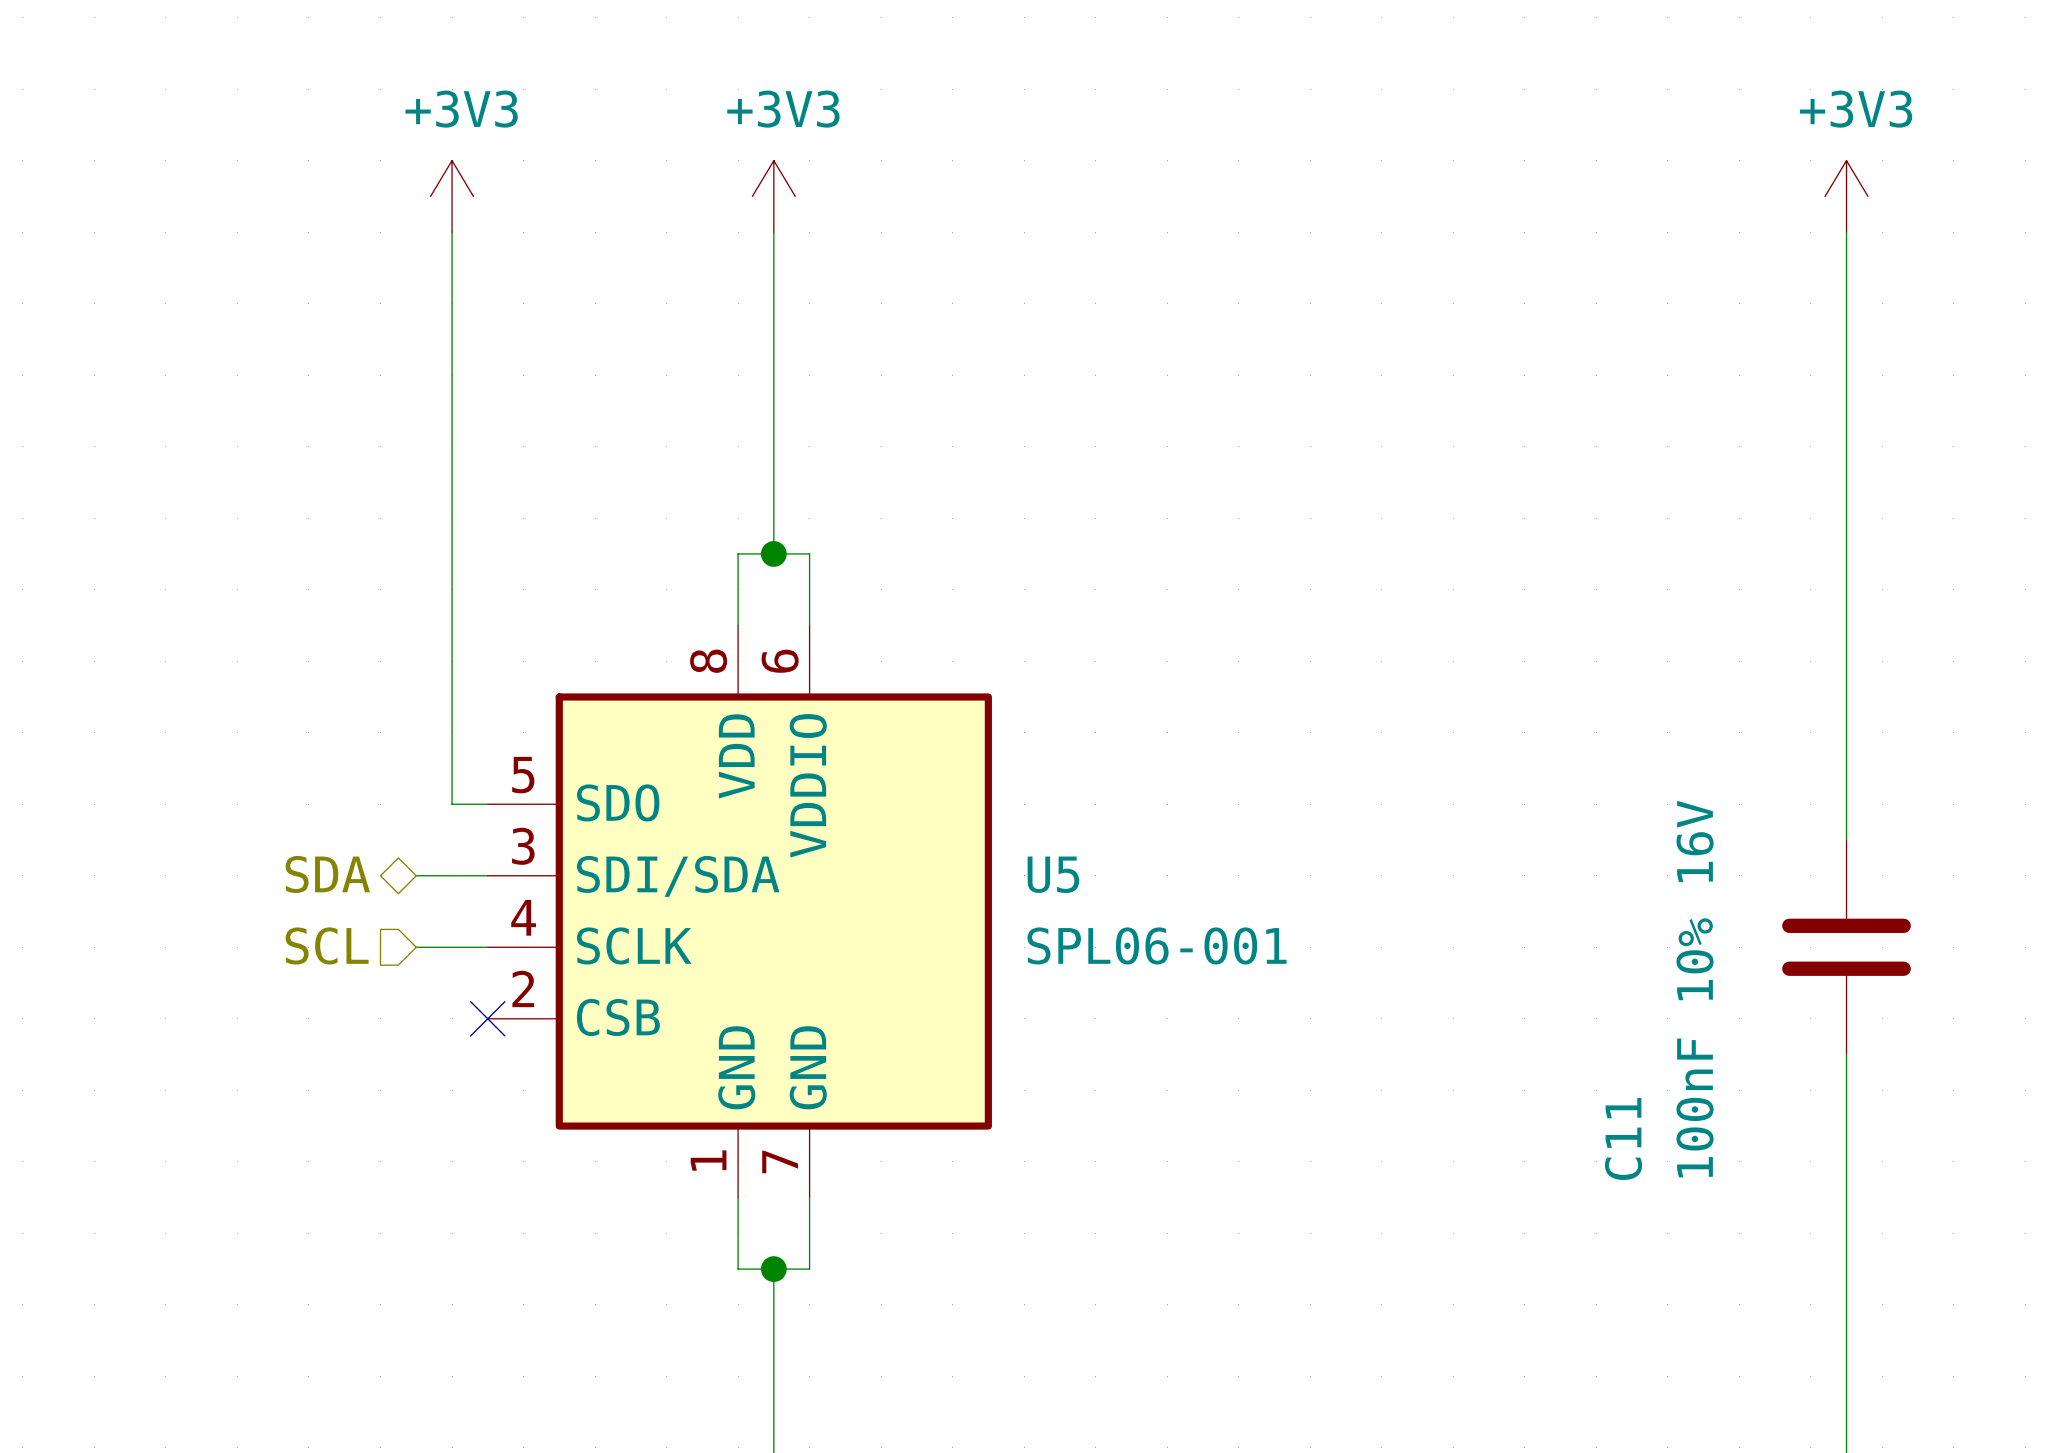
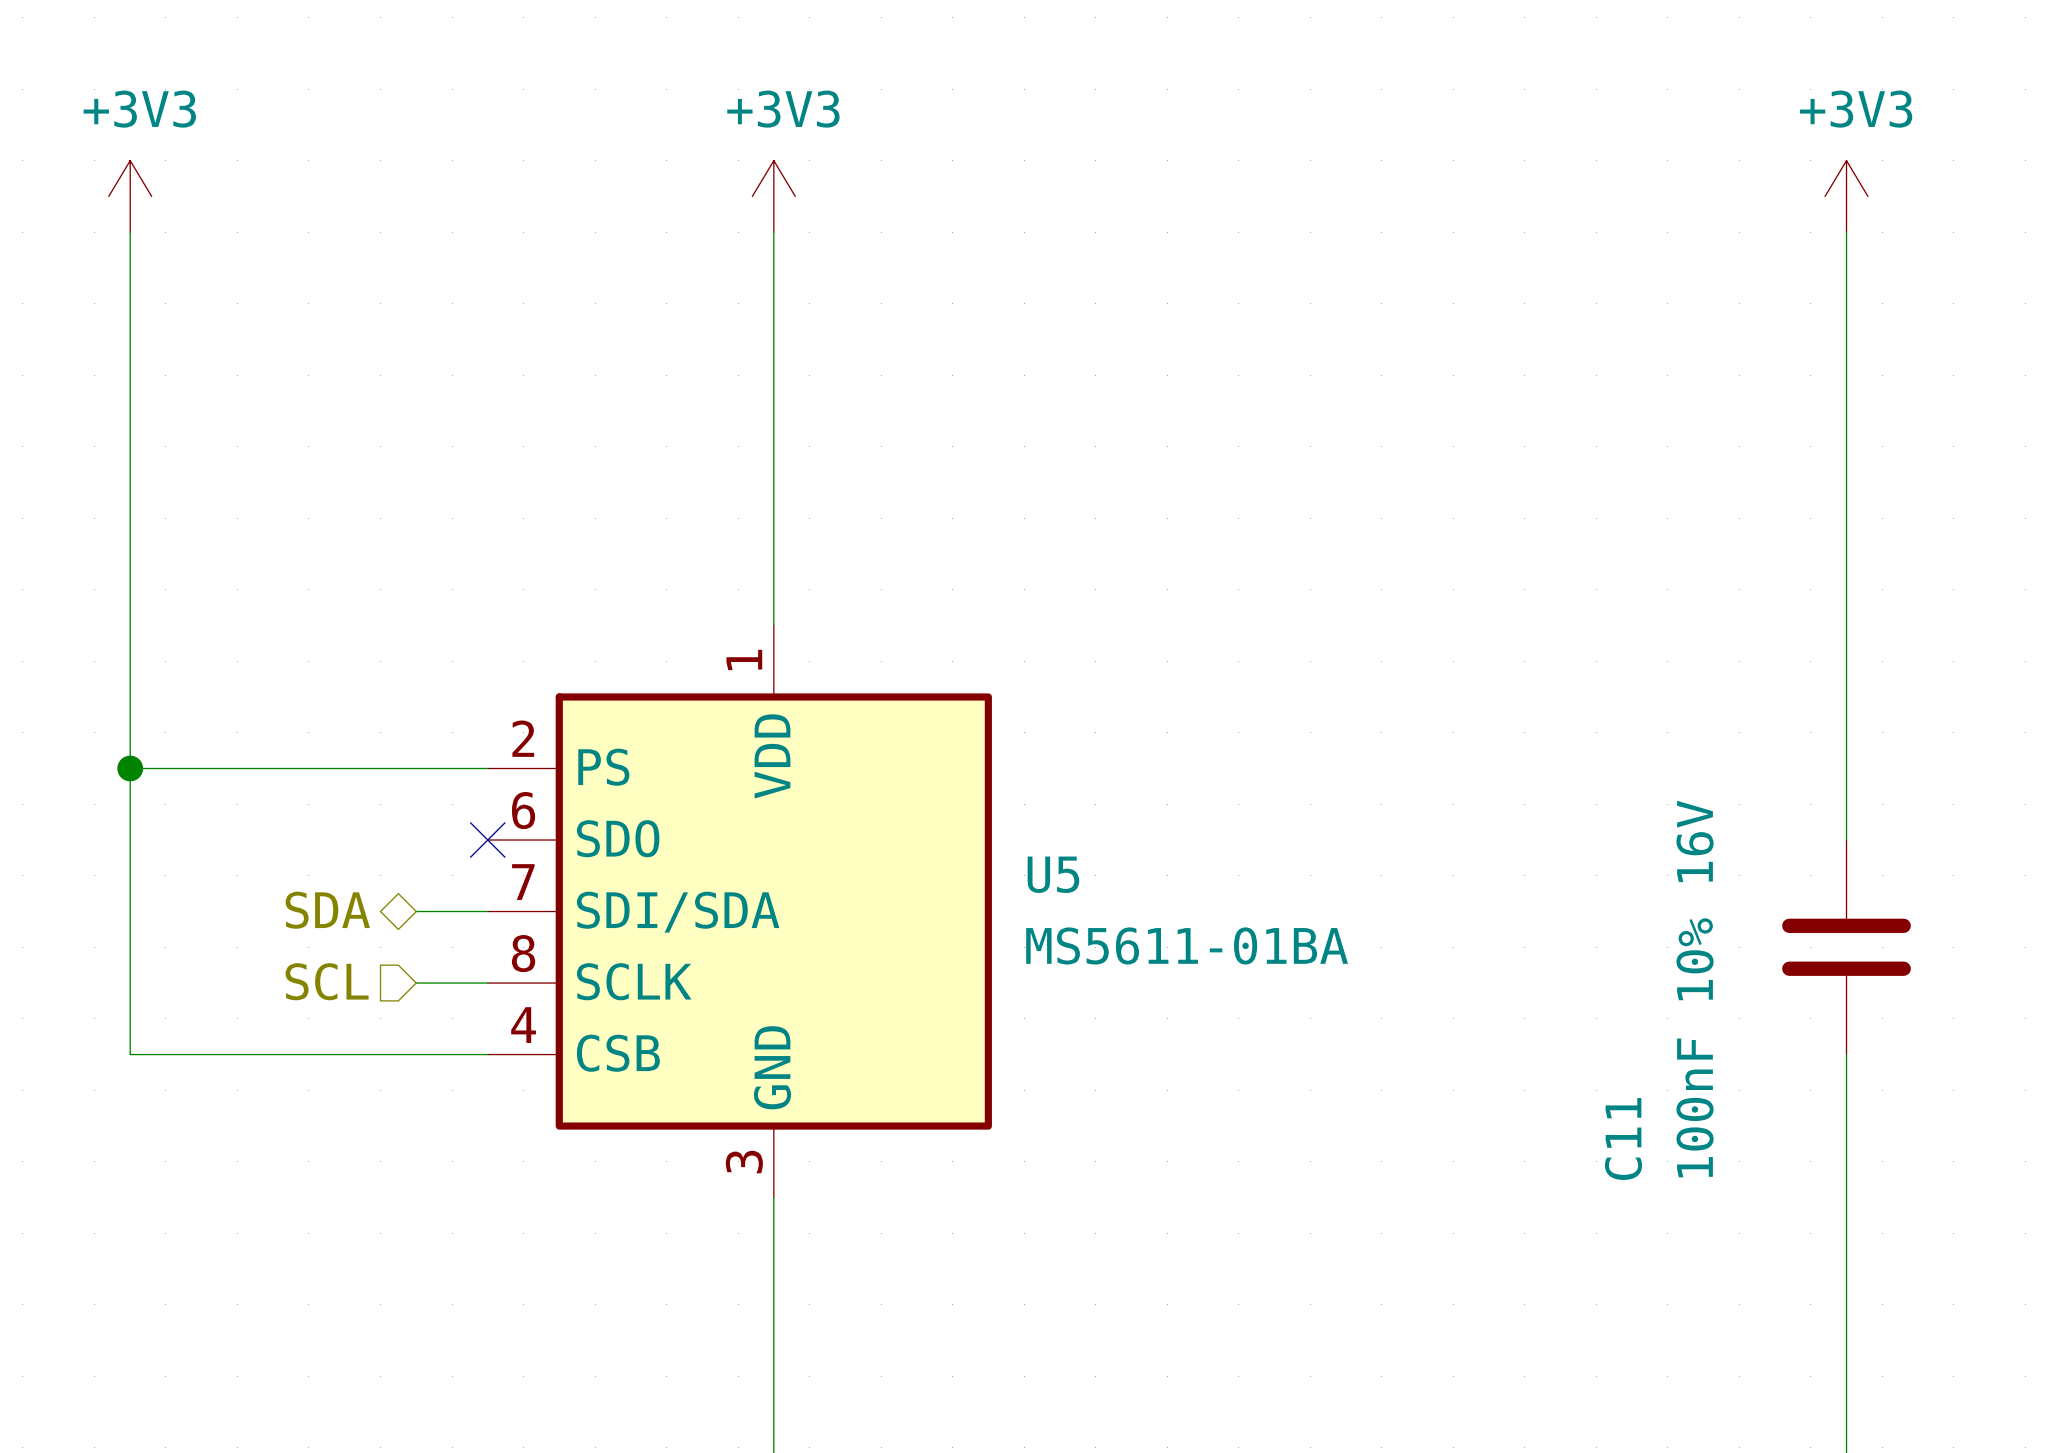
power symbol position: +3V3 (452, 196) -> +3V3 (130, 196)
wire: none -> (130, 232) (130, 1054) (487, 1054)
wire: (452, 232) (452, 804) (487, 804) -> none
wire: none -> (773, 553) (773, 625)
junction: (773, 553) -> none
U5 symbol: [487, 625, 992, 1198] -> [487, 625, 992, 1198]
wire: (738, 625) (738, 553) (809, 553) (809, 625) -> none
wire: none -> (130, 768) (487, 768)
junction: none -> (130, 768)
no-connect mark: none -> (487, 840)
hierarchical label position: SDA (327, 874) -> SDA (327, 910)
wire: (416, 875) (487, 875) -> (416, 911) (487, 911)
hierarchical label position: SCL (327, 945) -> SCL (327, 981)
U5 value: SPL06-001 (1156, 945) -> MS5611-01BA (1187, 945)
wire: (416, 947) (487, 947) -> (416, 983) (487, 983)
no-connect mark: (487, 1018) -> none
wire: (738, 1197) (738, 1269) (809, 1269) (809, 1197) -> none
wire: none -> (773, 1197) (773, 1269)
junction: (773, 1269) -> none

